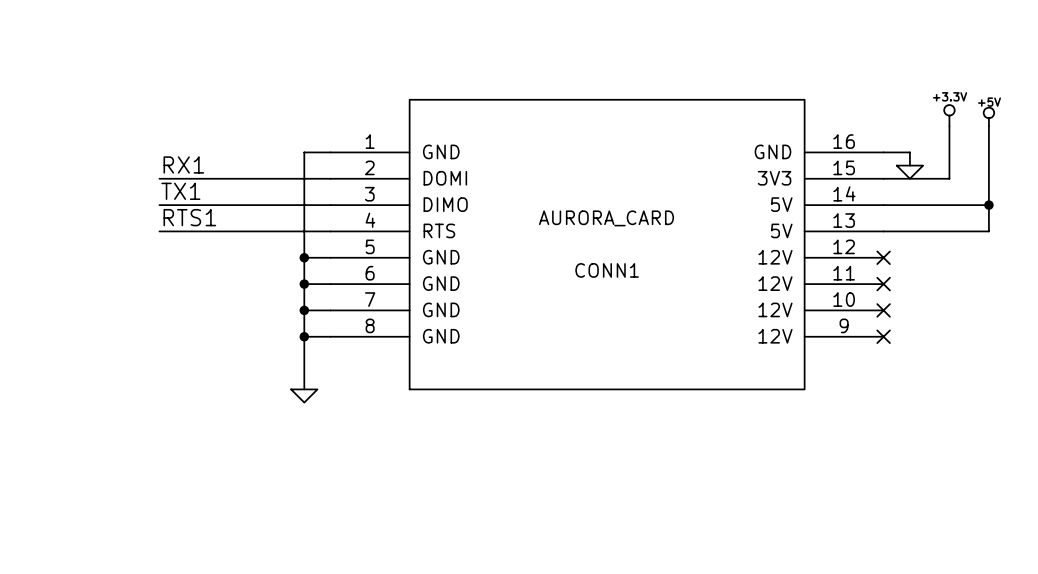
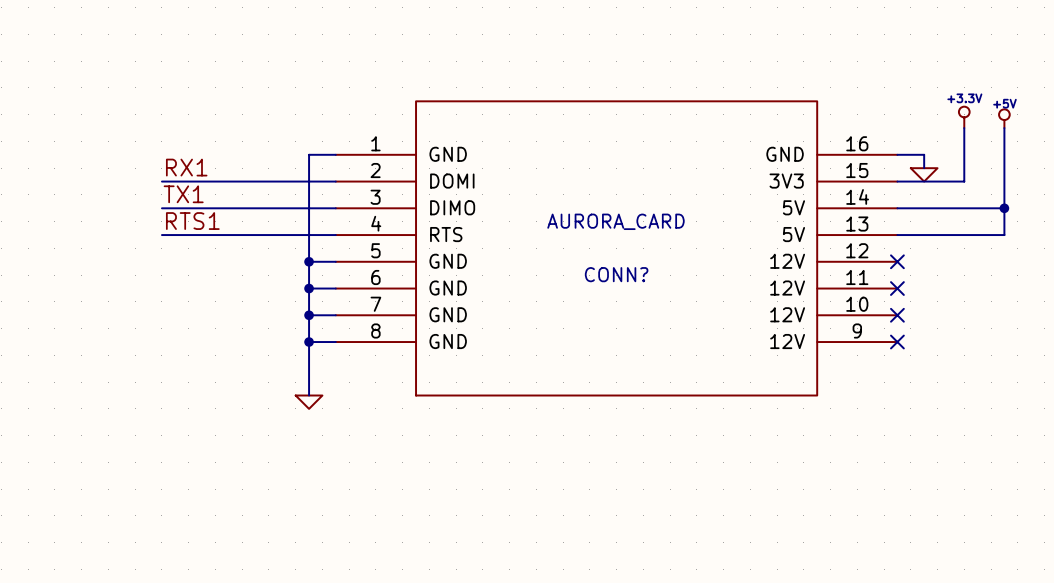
CONN1 name: CONN1 (607, 270) -> CONN? (616, 274)

